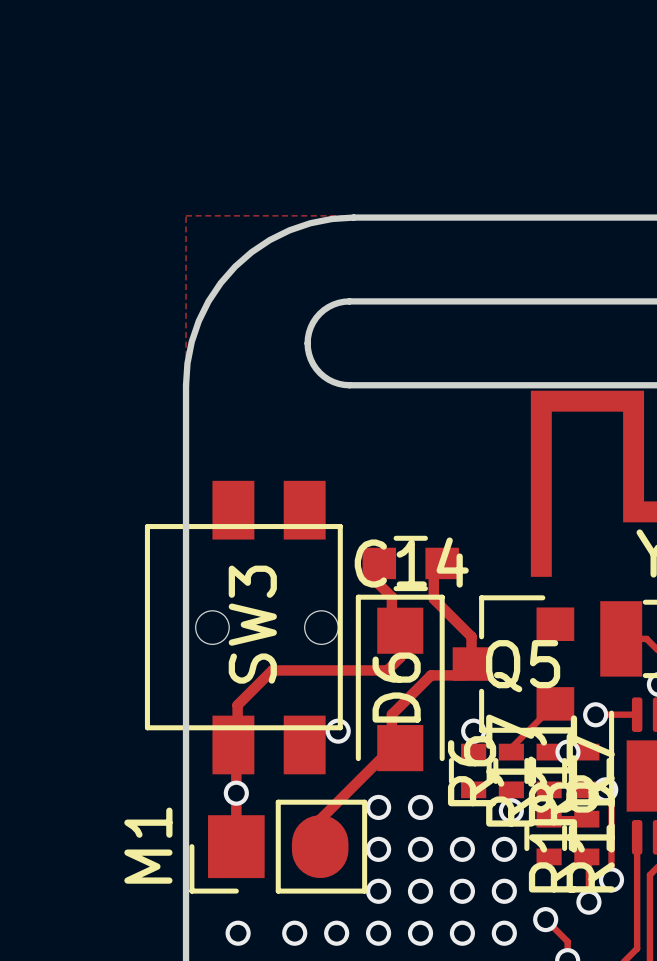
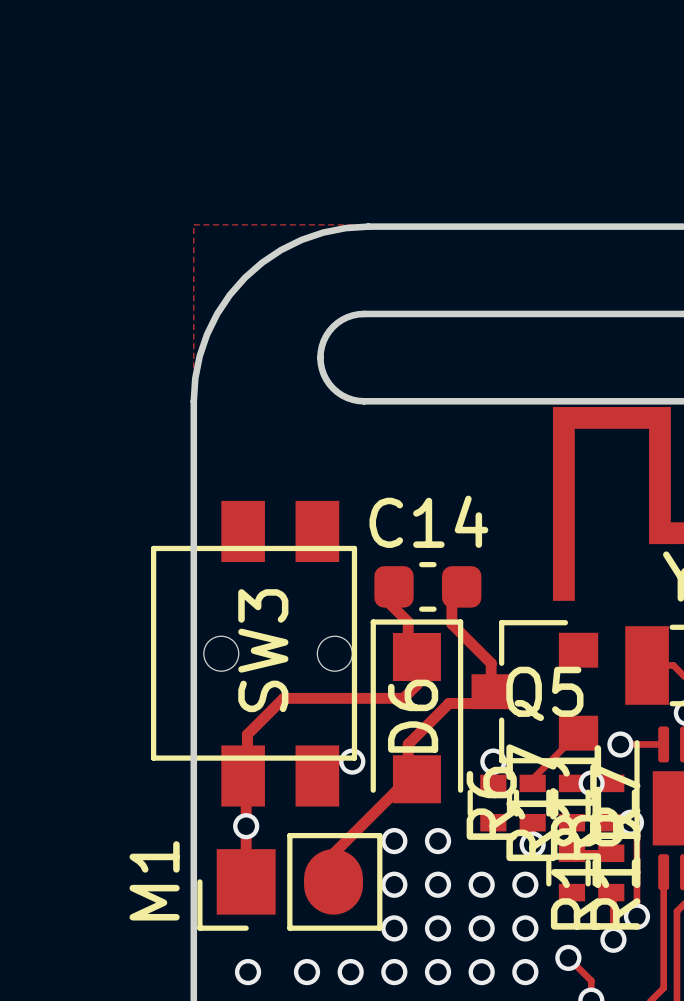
C14 footprint: [362, 535, 459, 592] -> [374, 562, 482, 612]
C14 name position: C14 (411, 562) -> C14 (428, 521)

